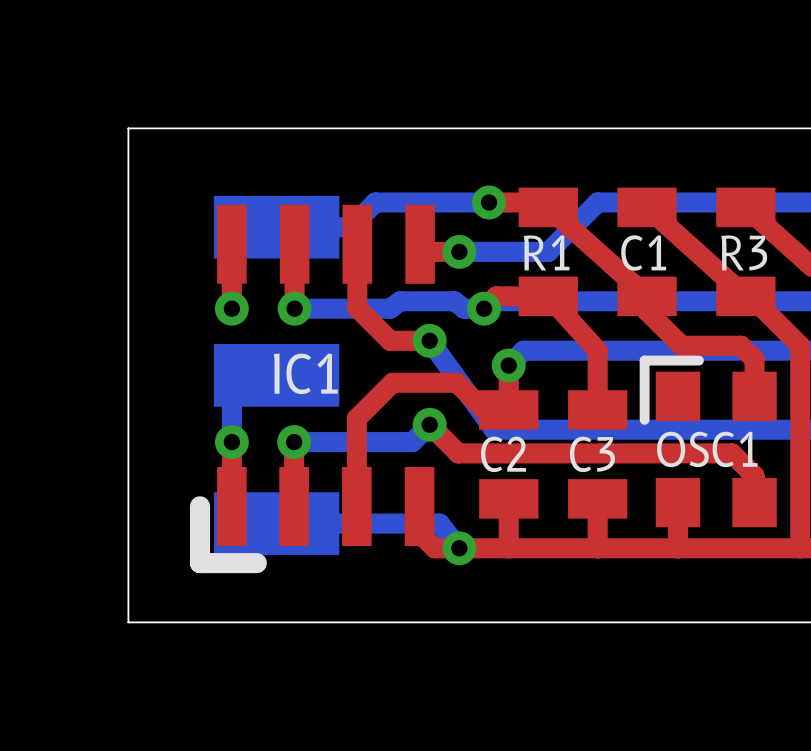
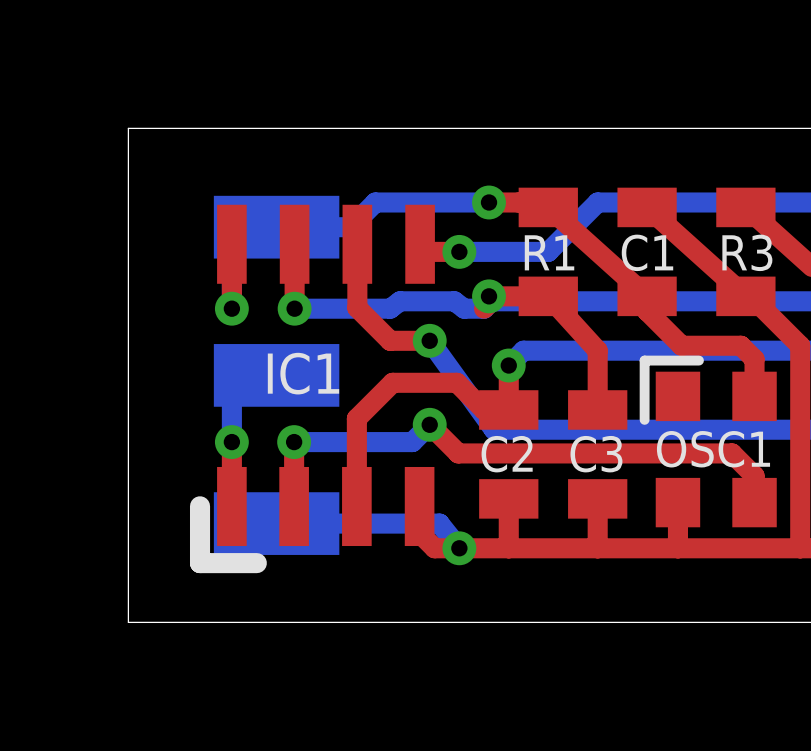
via position: (484, 308) -> (489, 296)

